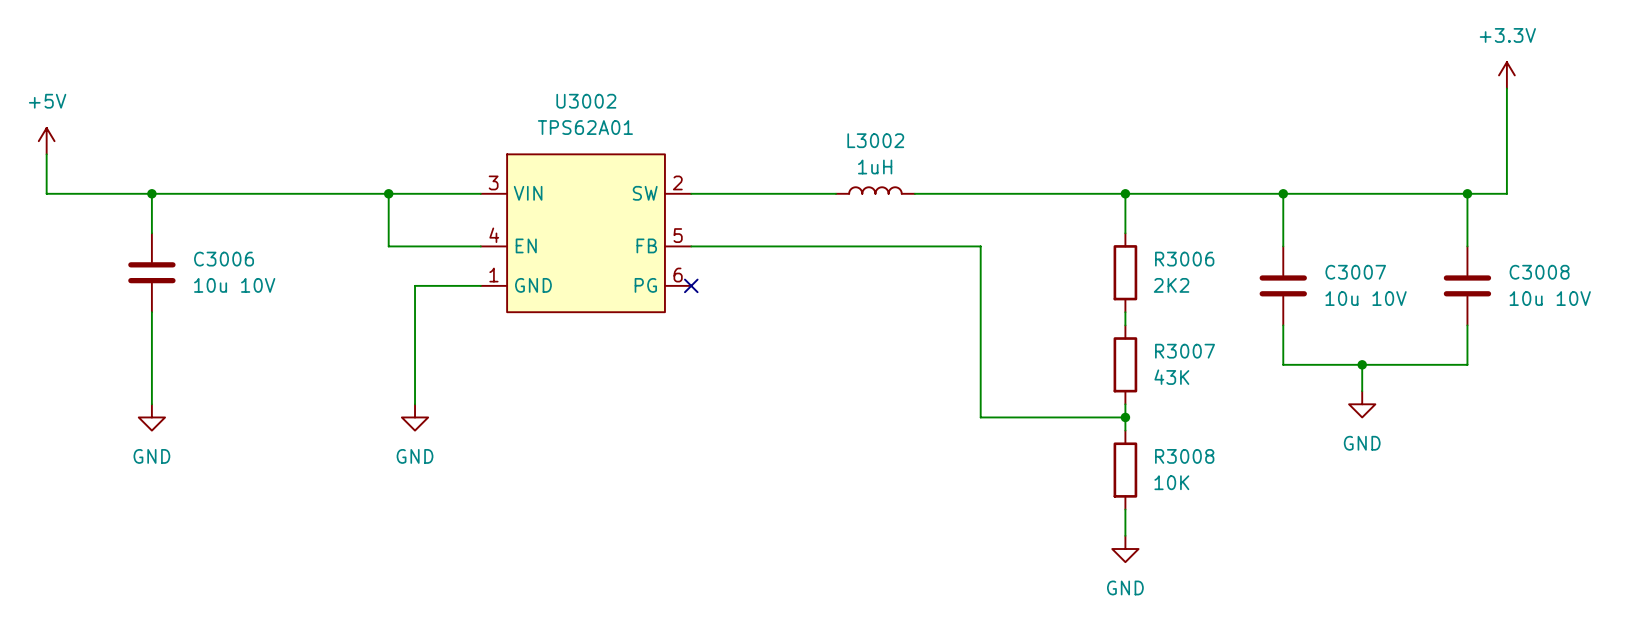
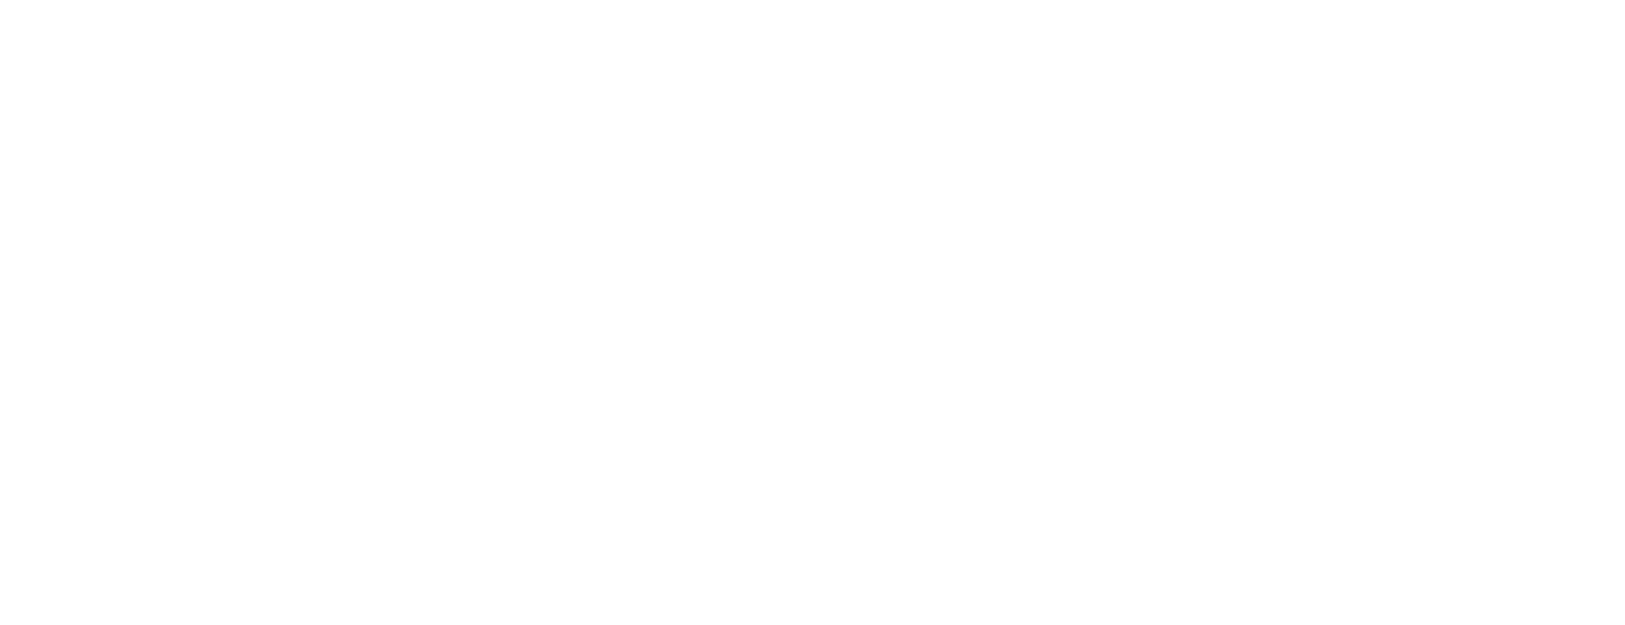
power symbol: +3.3V (1506, 75) -> none
wire: (1506, 88) (1506, 193) (914, 193) -> none
power symbol: +5V (46, 141) -> none
wire: (46, 154) (46, 193) (480, 193) -> none
L3002: 1uH (875, 190) -> none
wire: (151, 193) (151, 233) -> none
junction: (151, 193) -> none
wire: (388, 193) (388, 246) (480, 246) -> none
junction: (388, 193) -> none
wire: (691, 193) (835, 193) -> none
wire: (1125, 193) (1125, 233) -> none
junction: (1125, 193) -> none
wire: (1283, 193) (1283, 246) -> none
junction: (1283, 193) -> none
wire: (1467, 193) (1467, 246) -> none
junction: (1467, 193) -> none
U3002: TPS62A01 (586, 233) -> none
wire: (691, 246) (980, 246) (980, 417) (1125, 417) -> none
C3006: 10u 10V (151, 272) -> none
R3006: 2K2 (1125, 272) -> none
wire: (480, 285) (415, 285) (415, 404) -> none
no-connect mark: (691, 285) -> none
C3007: 10u 10V (1283, 285) -> none
C3008: 10u 10V (1467, 285) -> none
wire: (151, 312) (151, 404) -> none
wire: (1125, 312) (1125, 325) -> none
wire: (1283, 325) (1283, 364) (1467, 364) (1467, 325) -> none
R3007: 43K (1125, 364) -> none
wire: (1362, 364) (1362, 391) -> none
junction: (1362, 364) -> none
wire: (1125, 404) (1125, 430) -> none
power symbol: GND (1362, 404) -> none
power symbol: GND (151, 417) -> none
power symbol: GND (415, 417) -> none
junction: (1125, 417) -> none
R3008: 10K (1125, 470) -> none
wire: (1125, 509) (1125, 535) -> none
power symbol: GND (1125, 549) -> none

